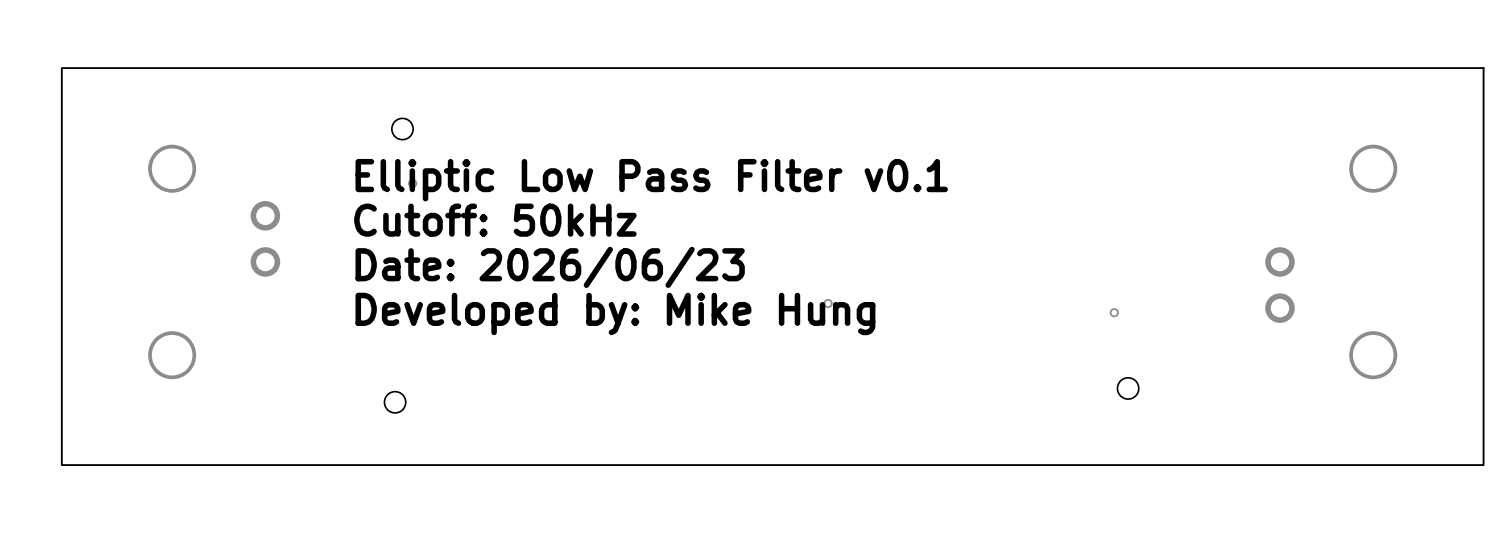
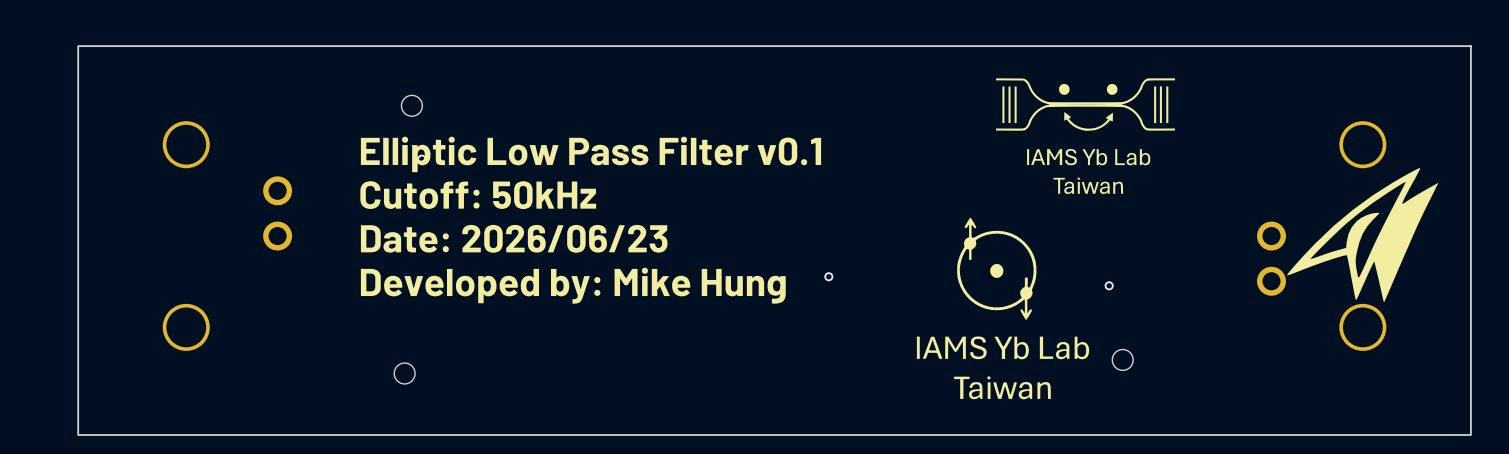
drawing: none -> [996, 78, 1175, 195]
drawing: none -> [1287, 167, 1439, 303]
drawing: none -> [916, 217, 1090, 400]

